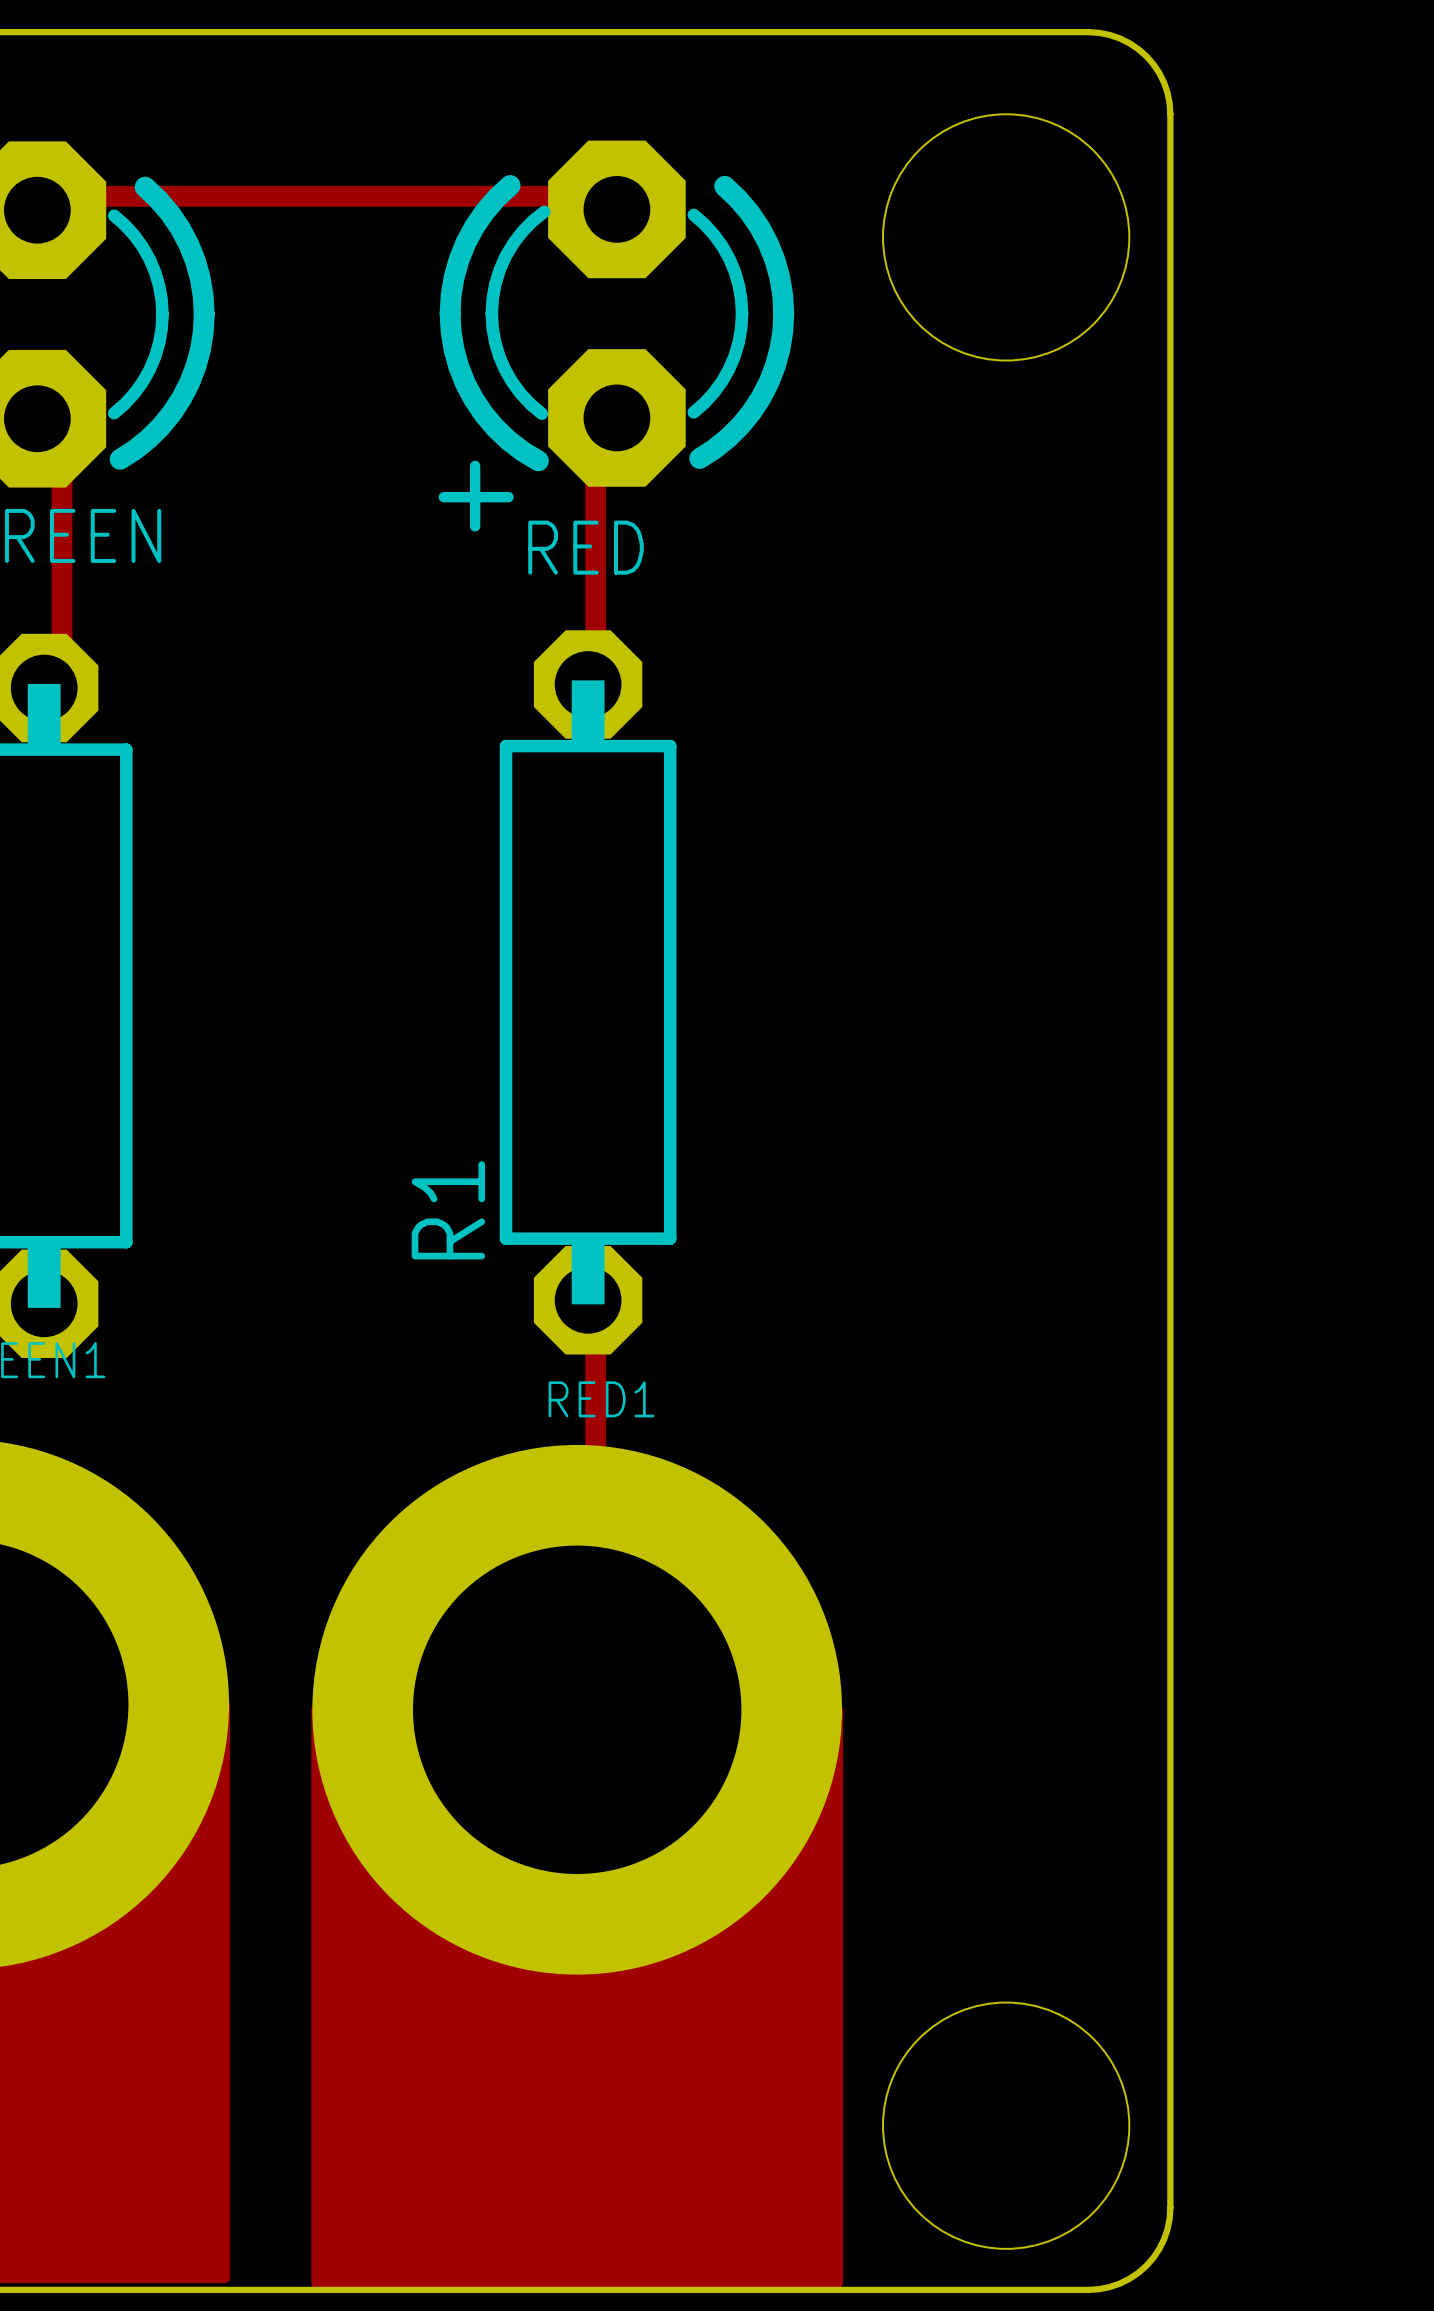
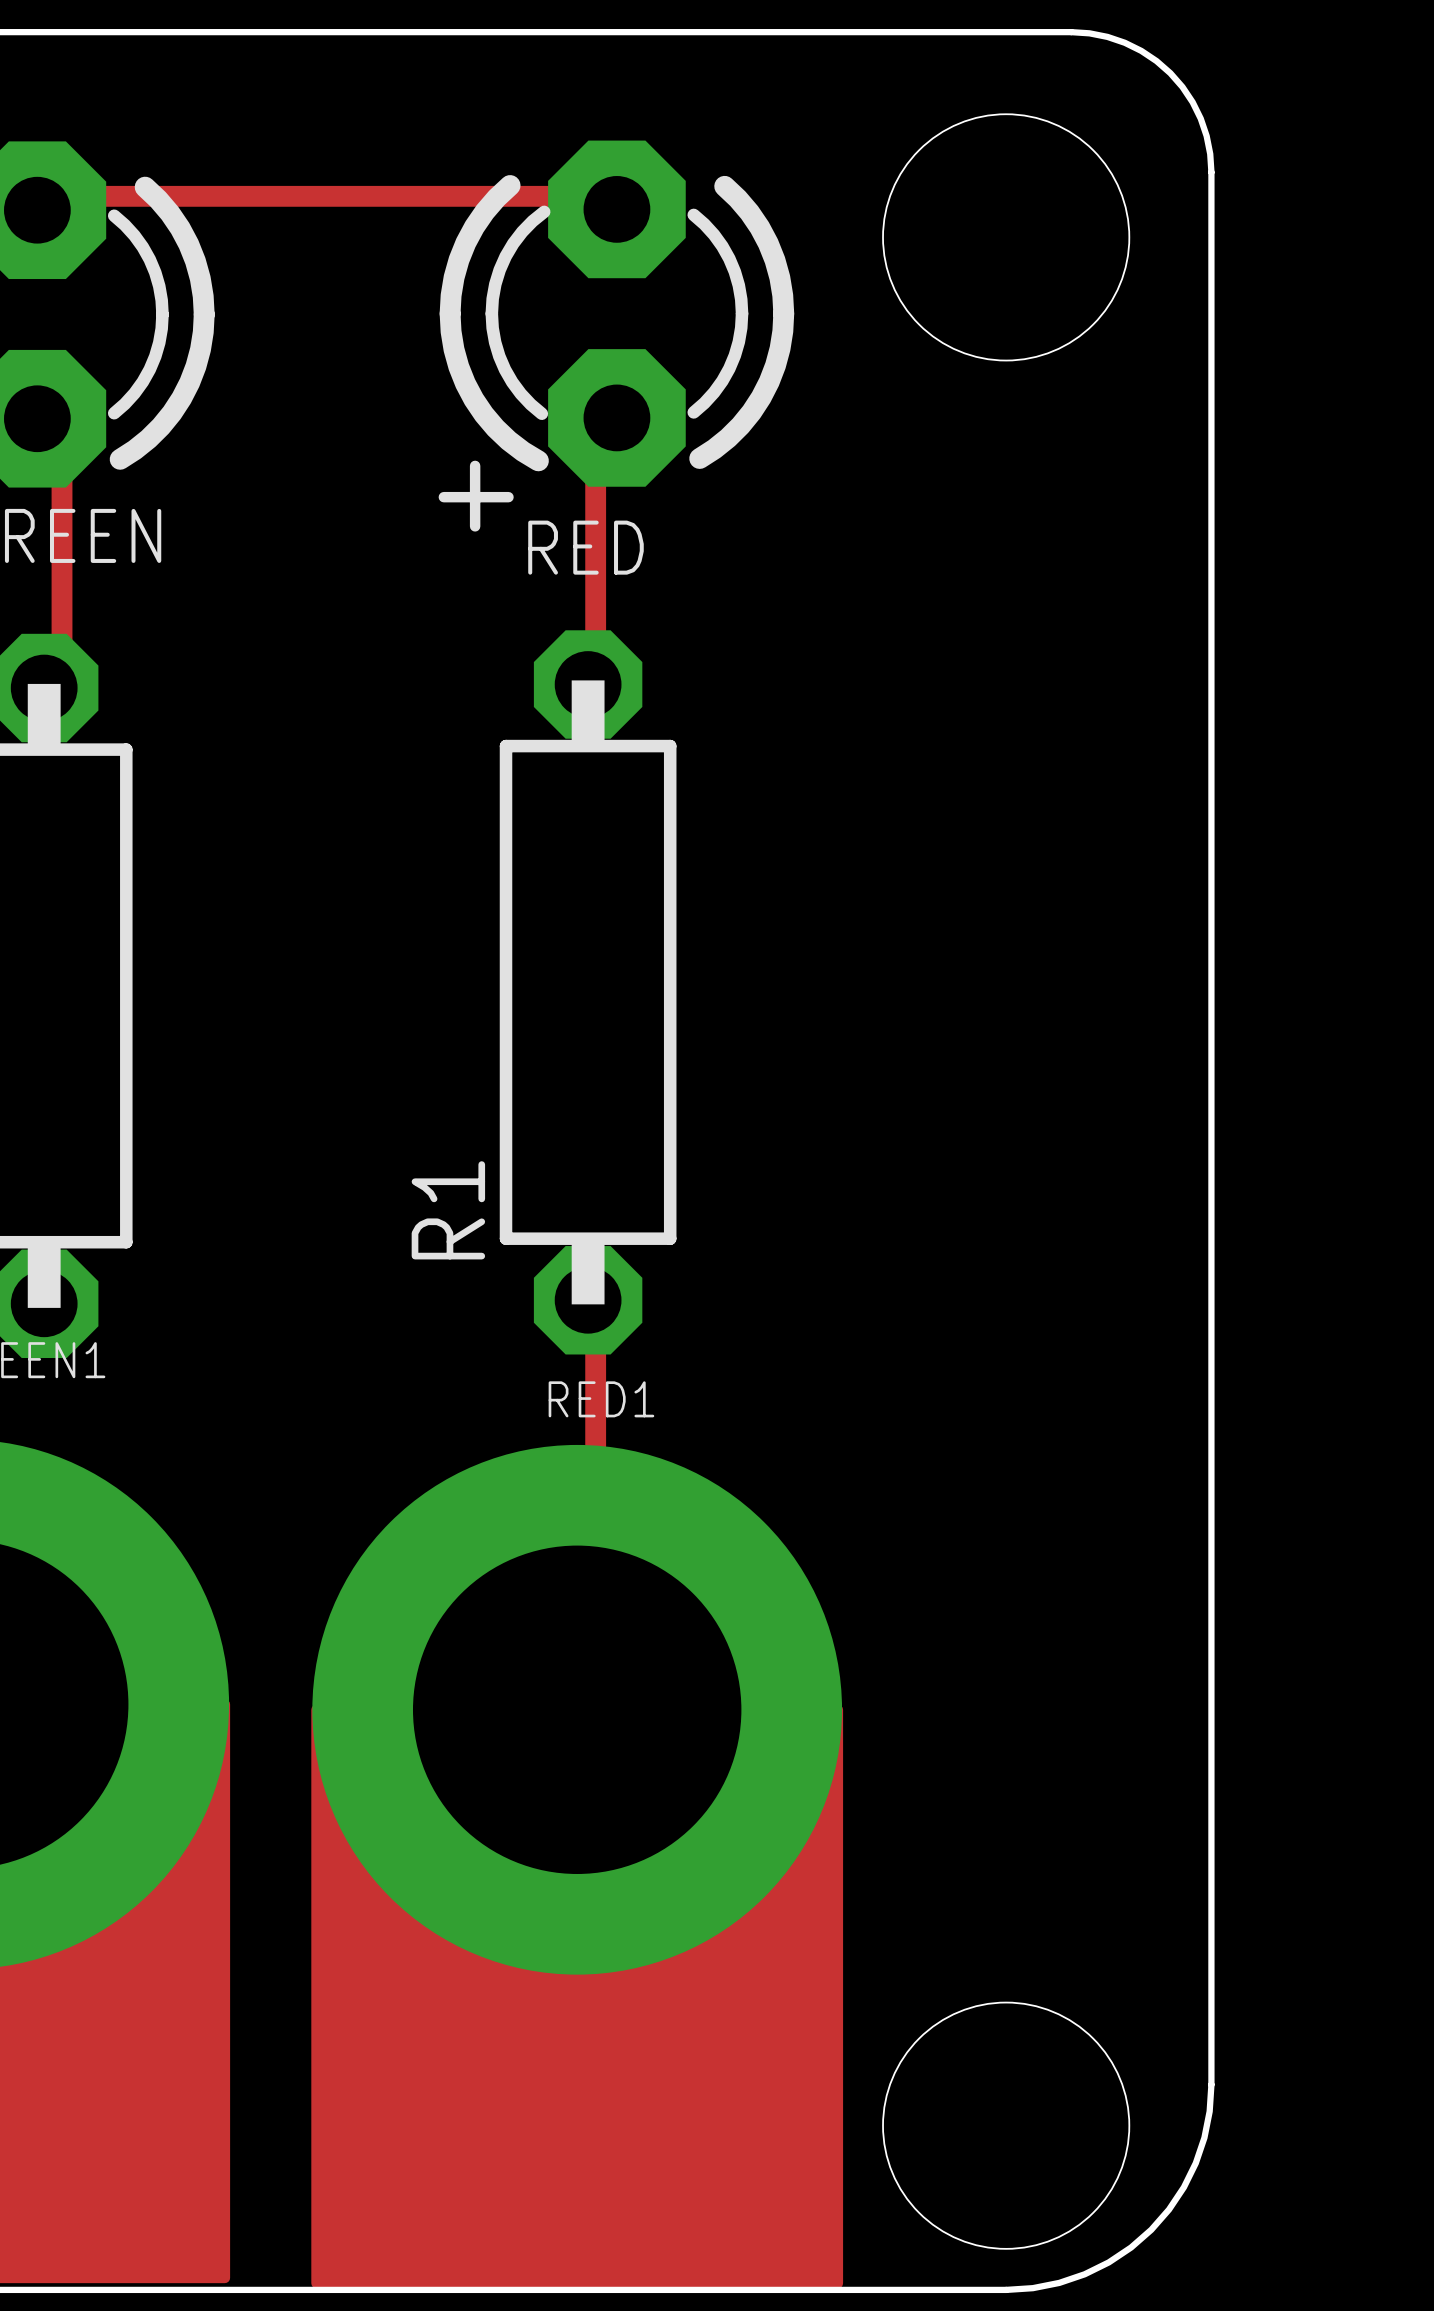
board edge: (1071, 32) (1109, 34) (1138, 49) (1153, 64) (1164, 82) (1170, 114) (1170, 2207) (1167, 2229) (1159, 2248) (1146, 2265) (1129, 2278) (1098, 2289) (1006, 2289) -> (1071, 32) (1089, 33) (1124, 42) (1156, 61) (1170, 73) (1182, 86) (1200, 118) (1210, 153) (1211, 2084) (1209, 2111) (1204, 2137) (1195, 2163) (1183, 2187) (1169, 2209) (1151, 2229) (1131, 2247) (1108, 2262) (1084, 2274) (1059, 2282) (1032, 2288) (1006, 2289)

